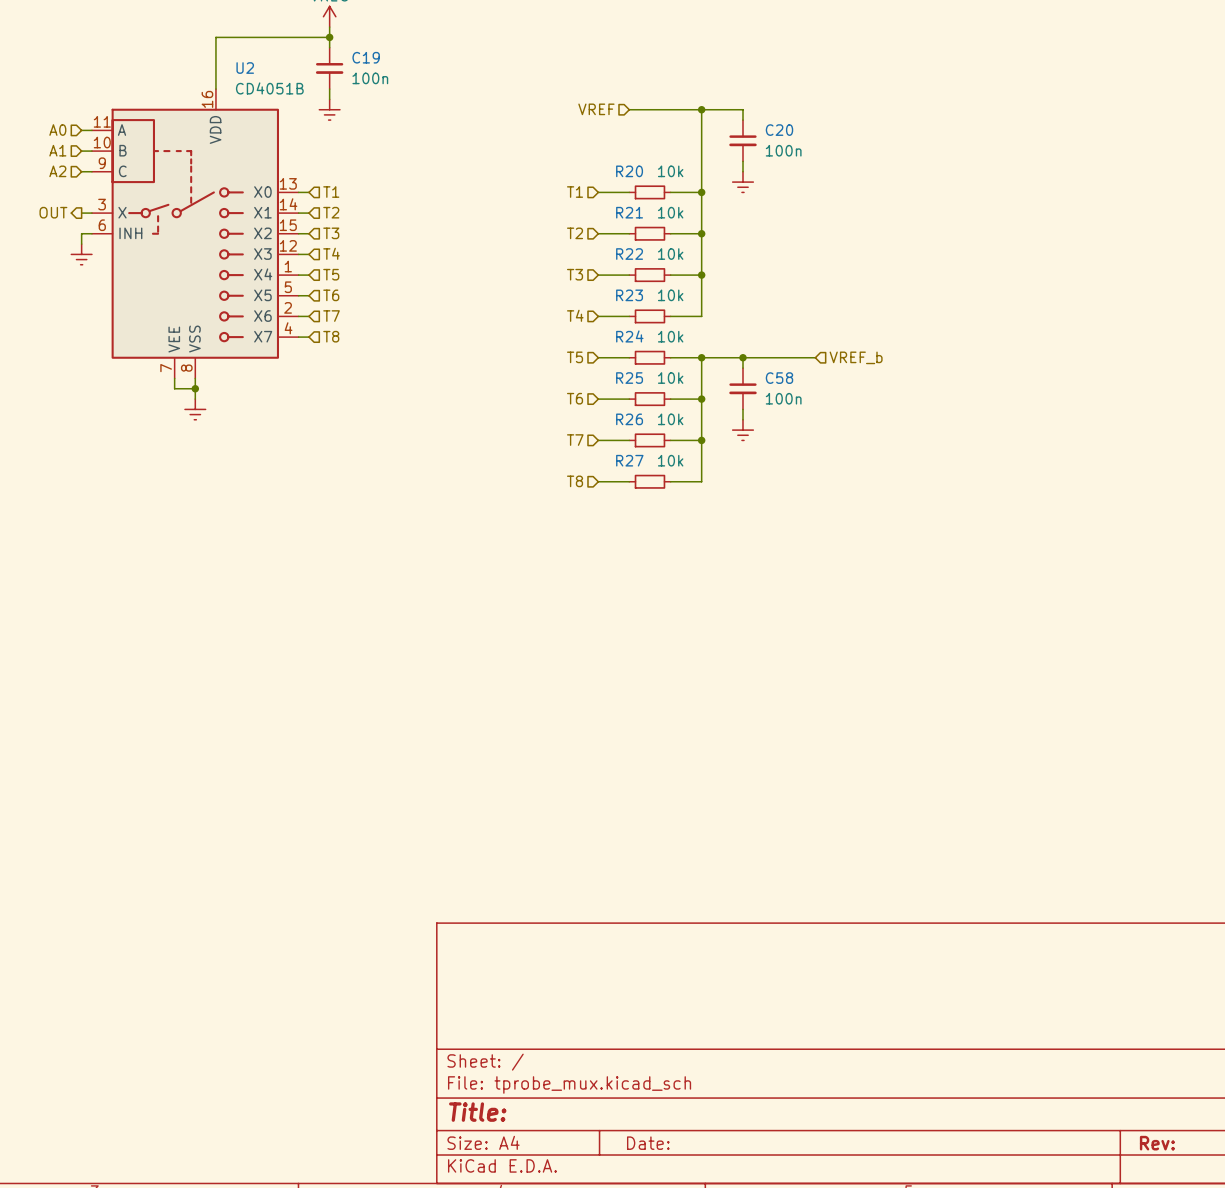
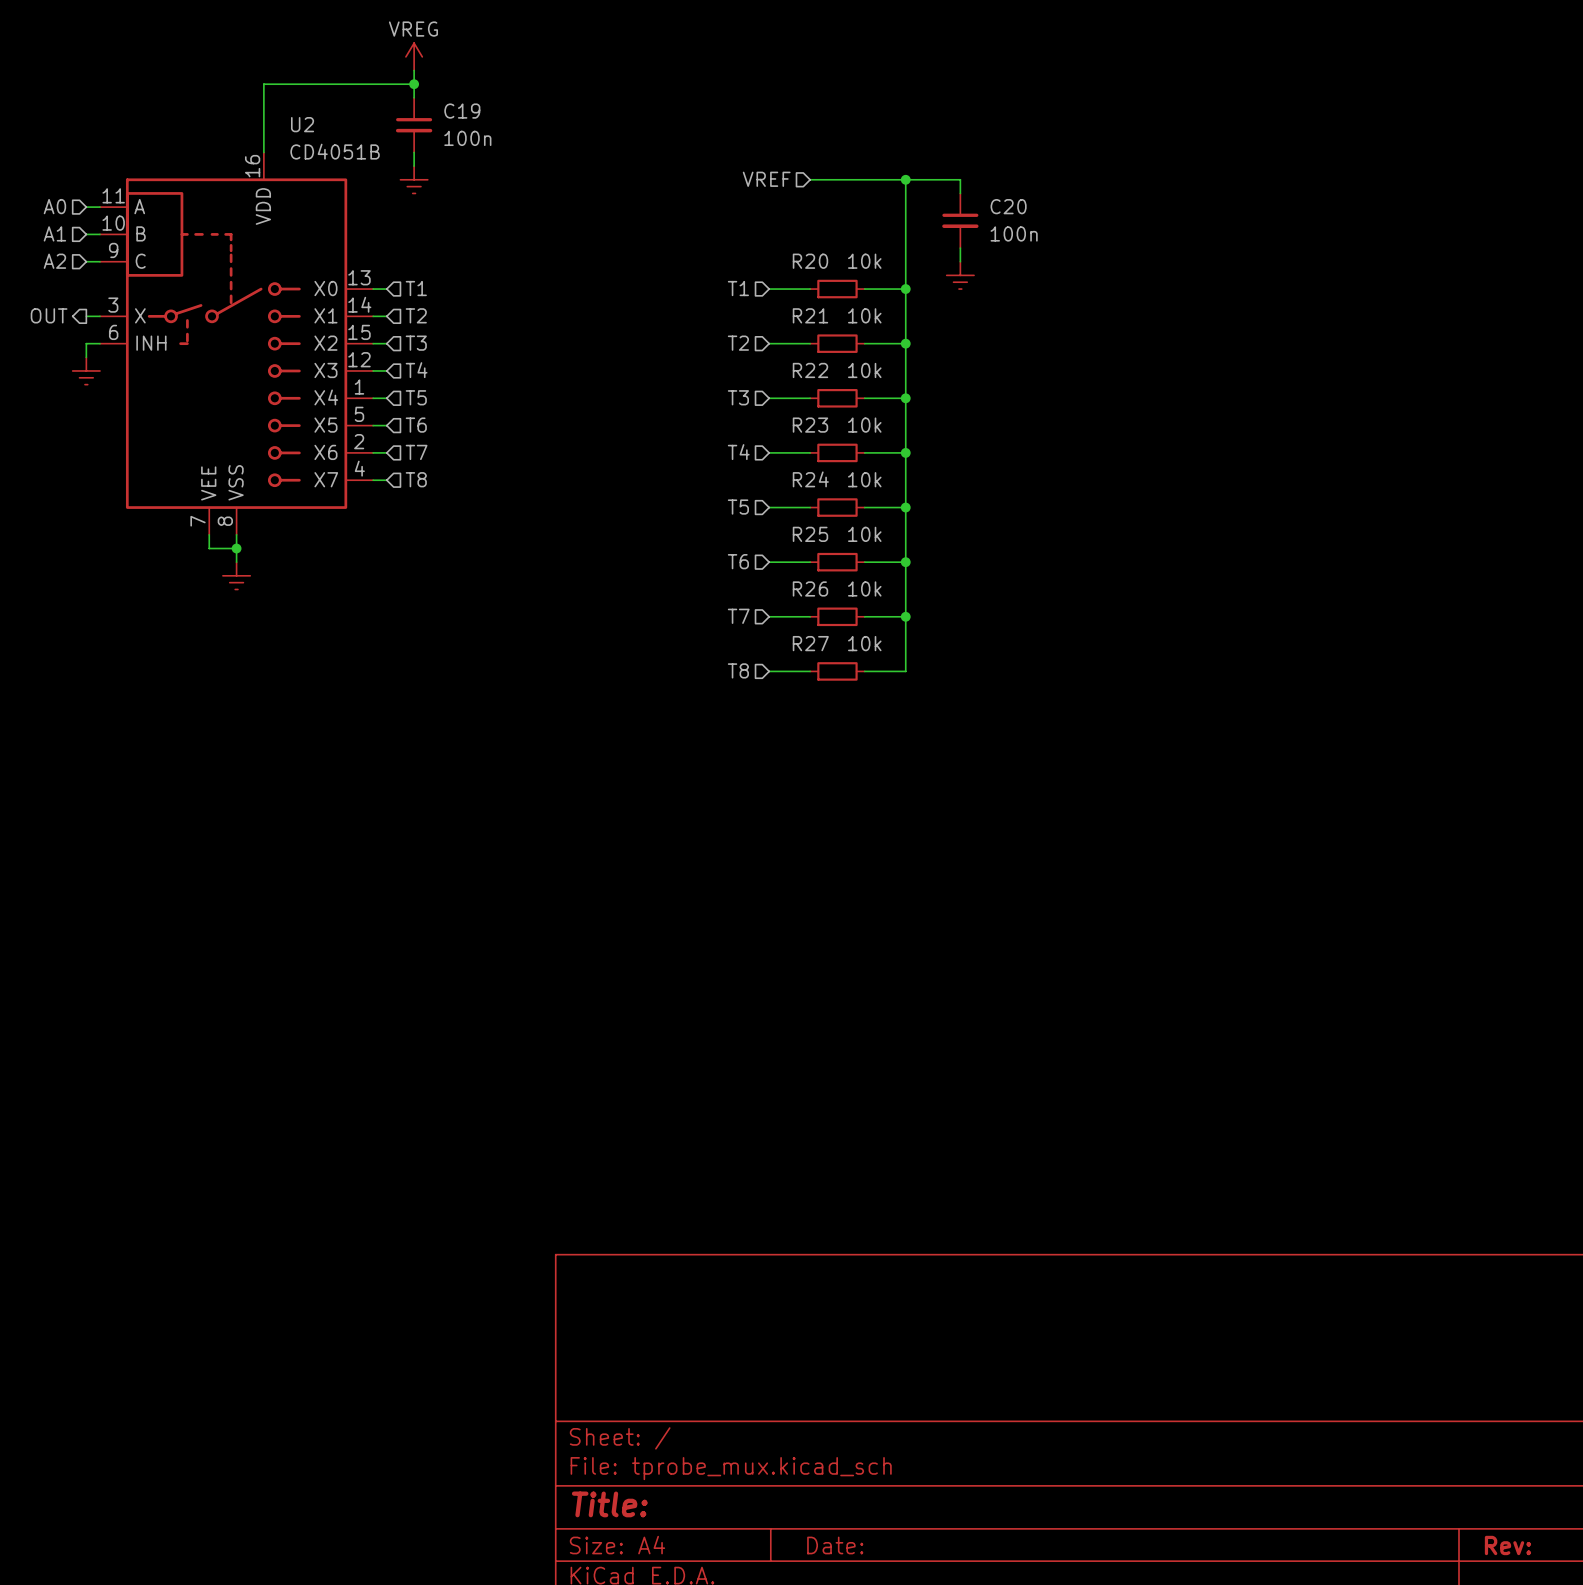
junction: none -> (905, 452)
wire: (701, 357) (815, 357) -> (905, 507) (905, 452)
wire: (742, 357) (742, 368) -> none
junction: (742, 357) -> none
hierarchical label: VREF_b (856, 357) -> none
C58: 100n (742, 388) -> none
wire: (742, 409) (742, 419) -> none
power symbol: (742, 430) -> none

